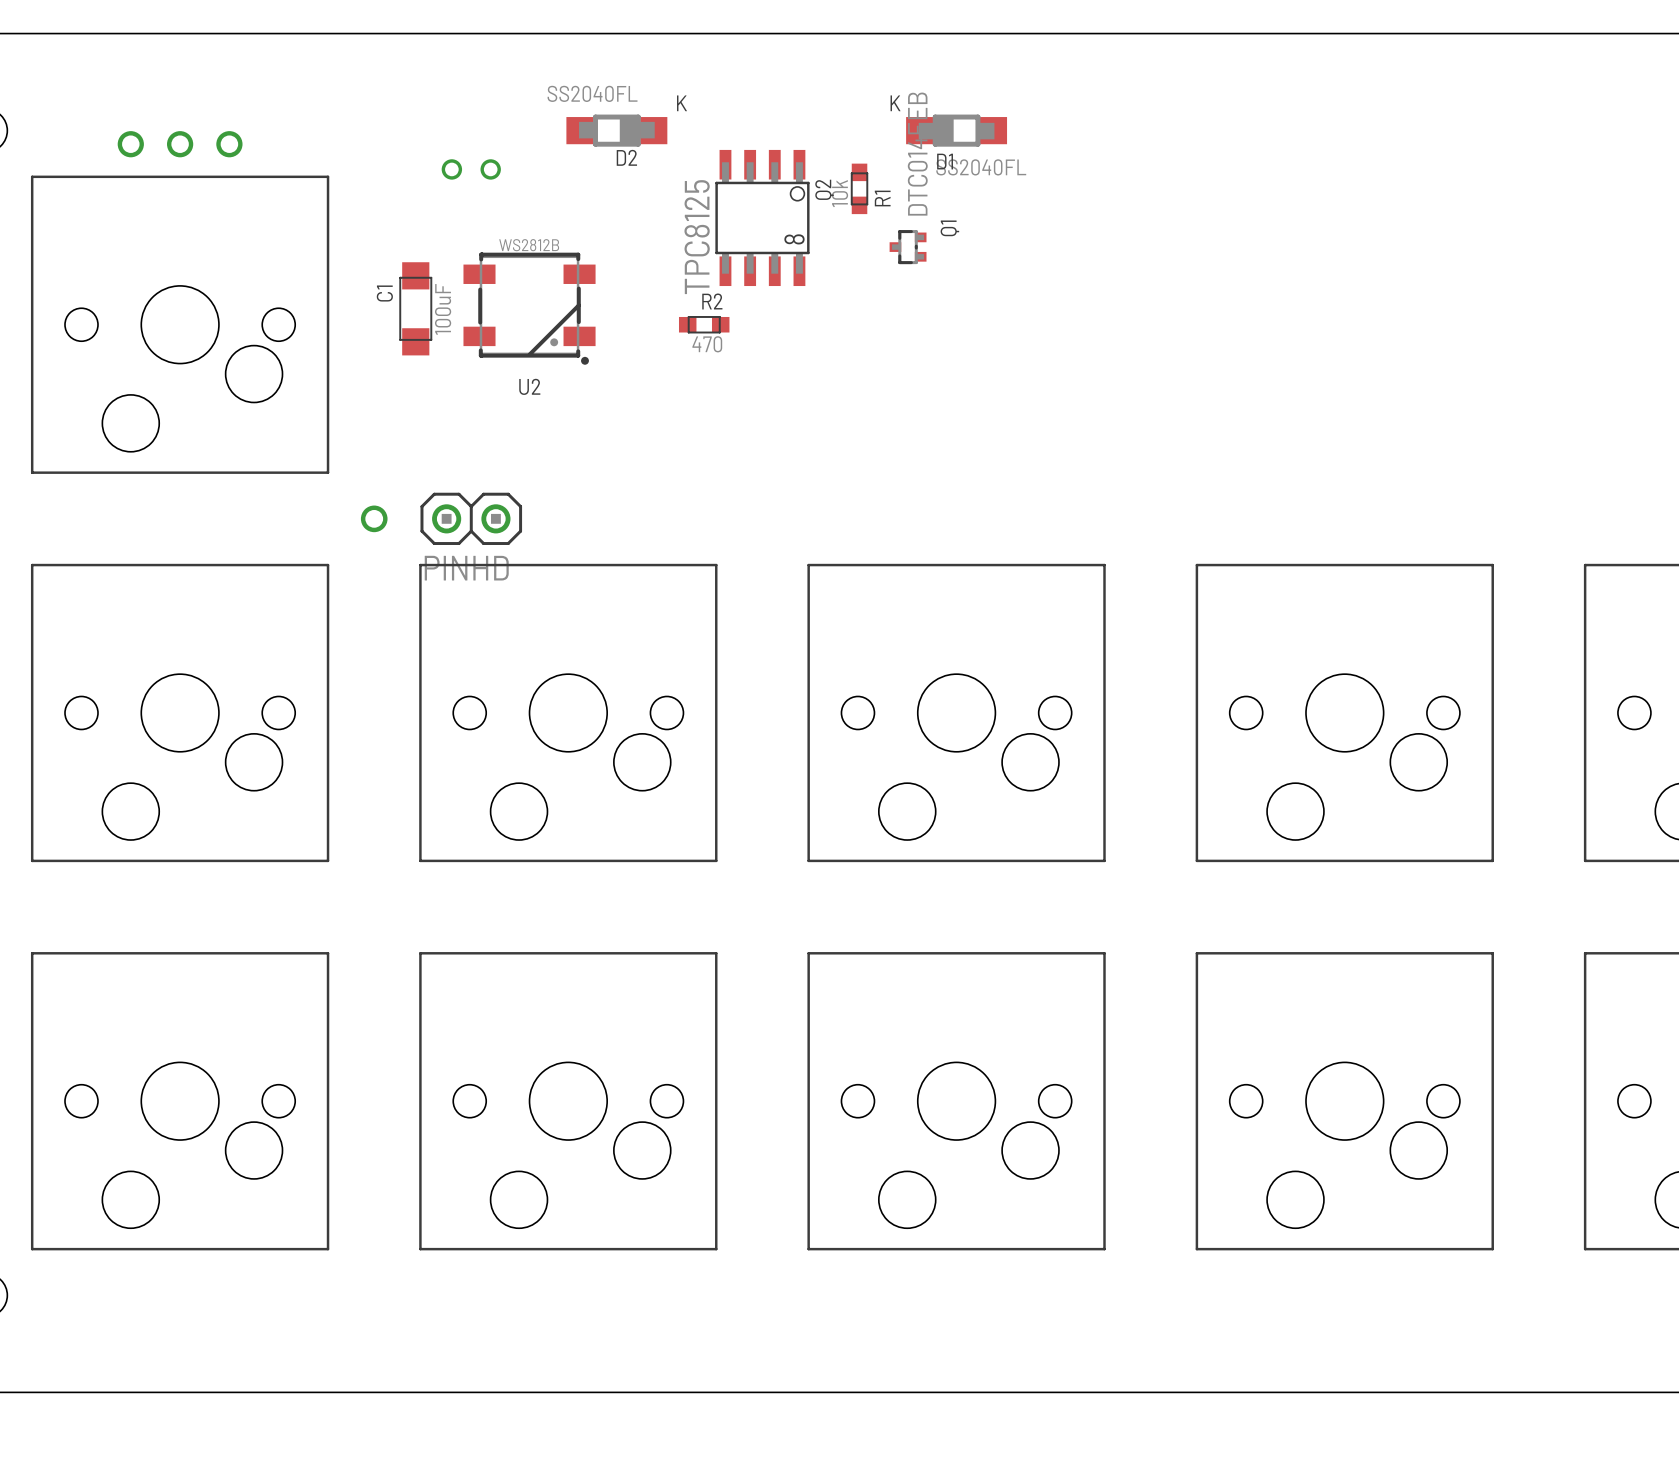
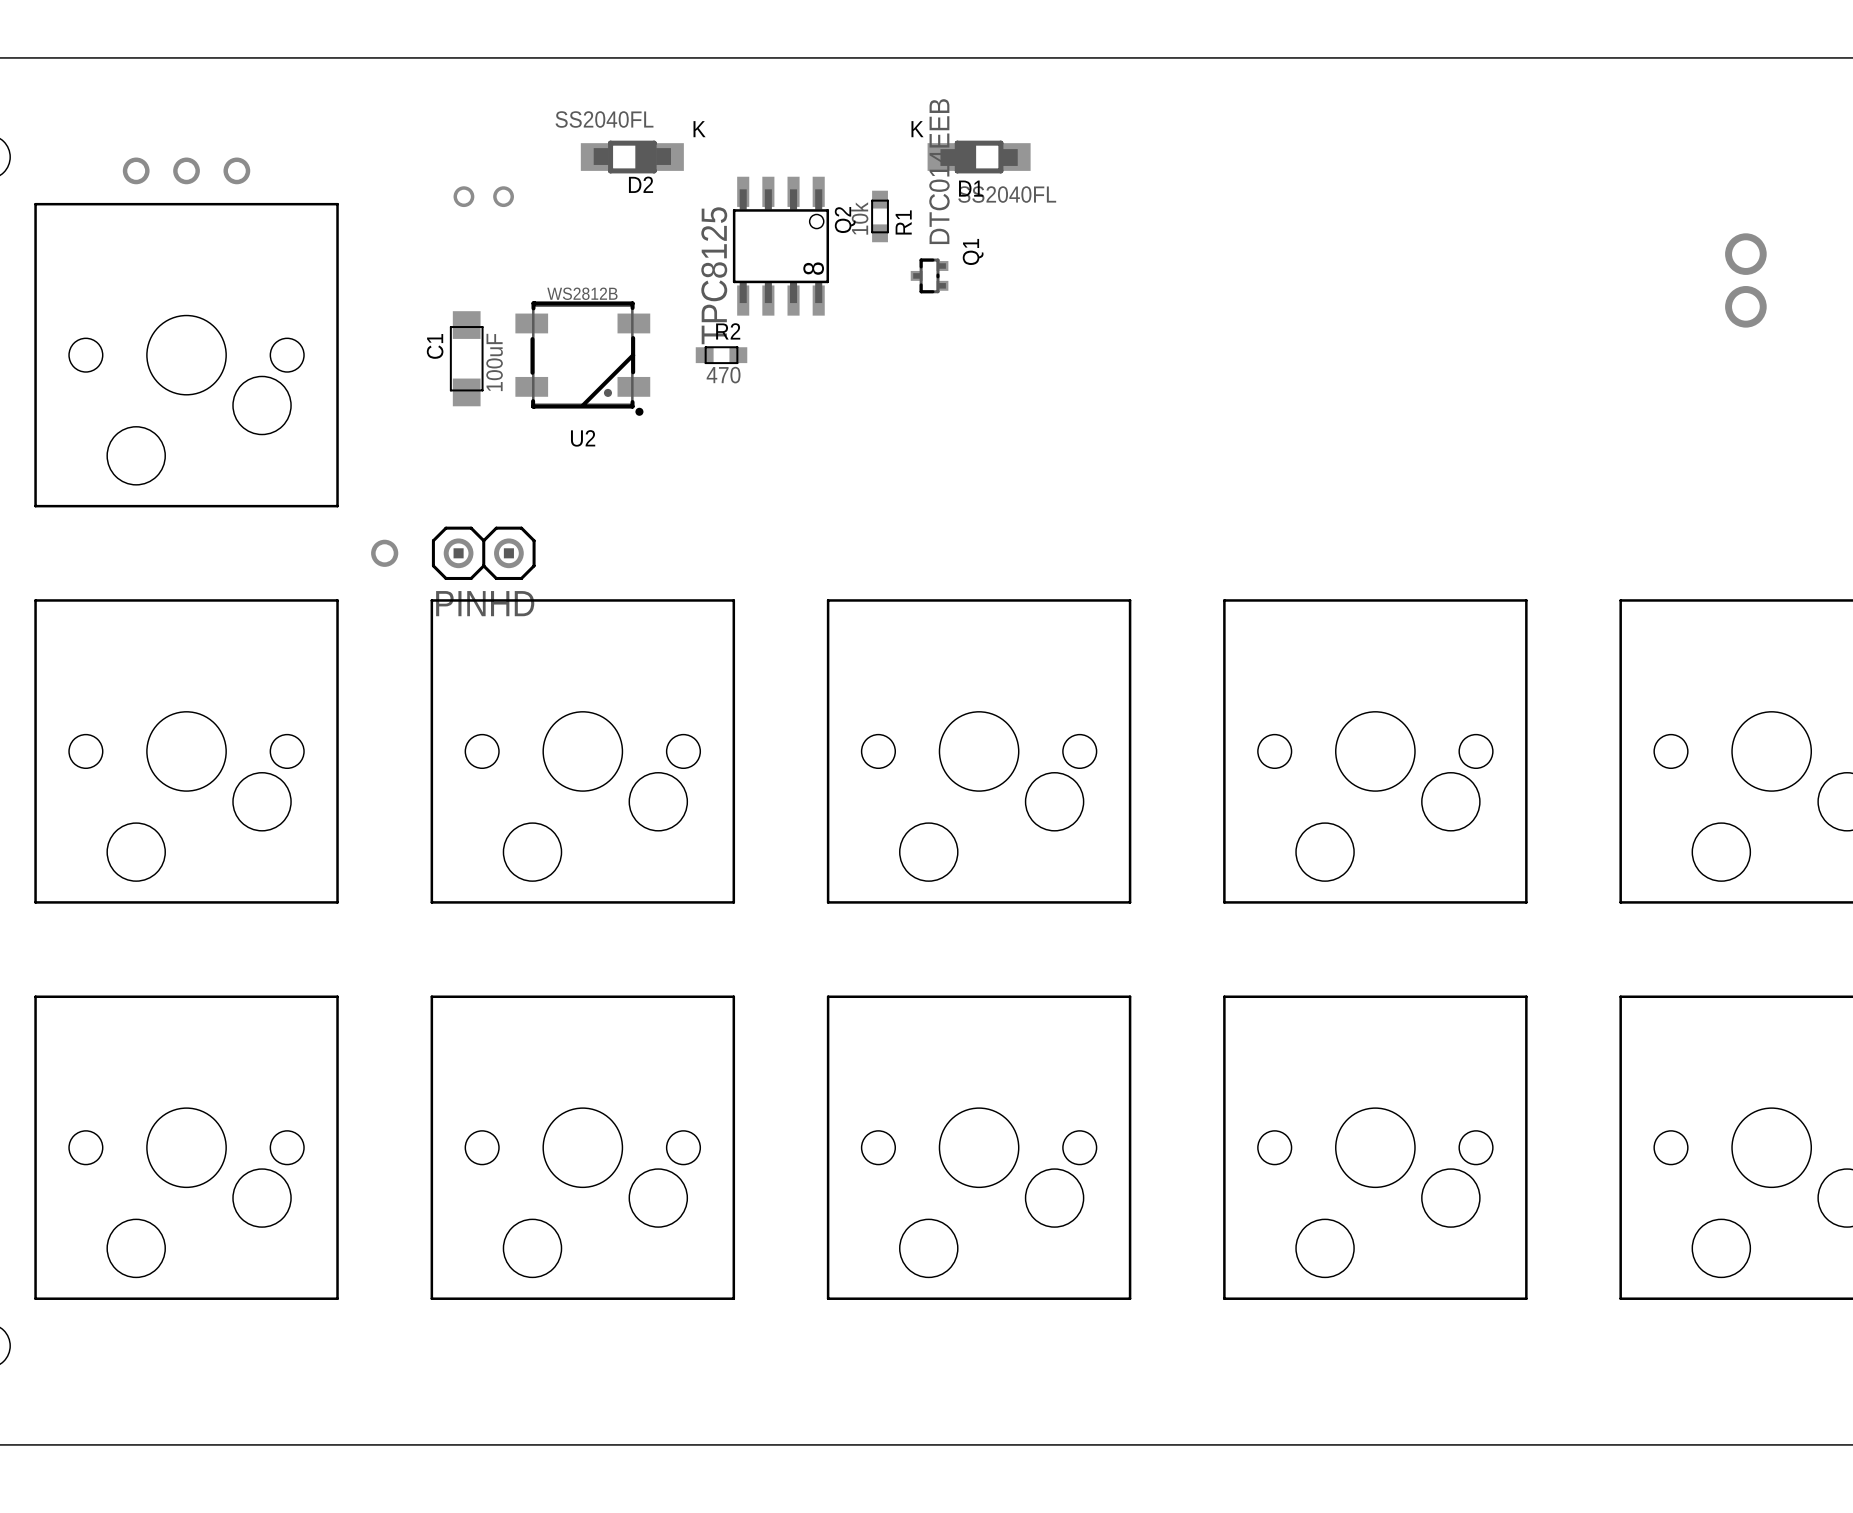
C1 position: (415, 308) -> (466, 358)
U2 position: (529, 308) -> (582, 358)

